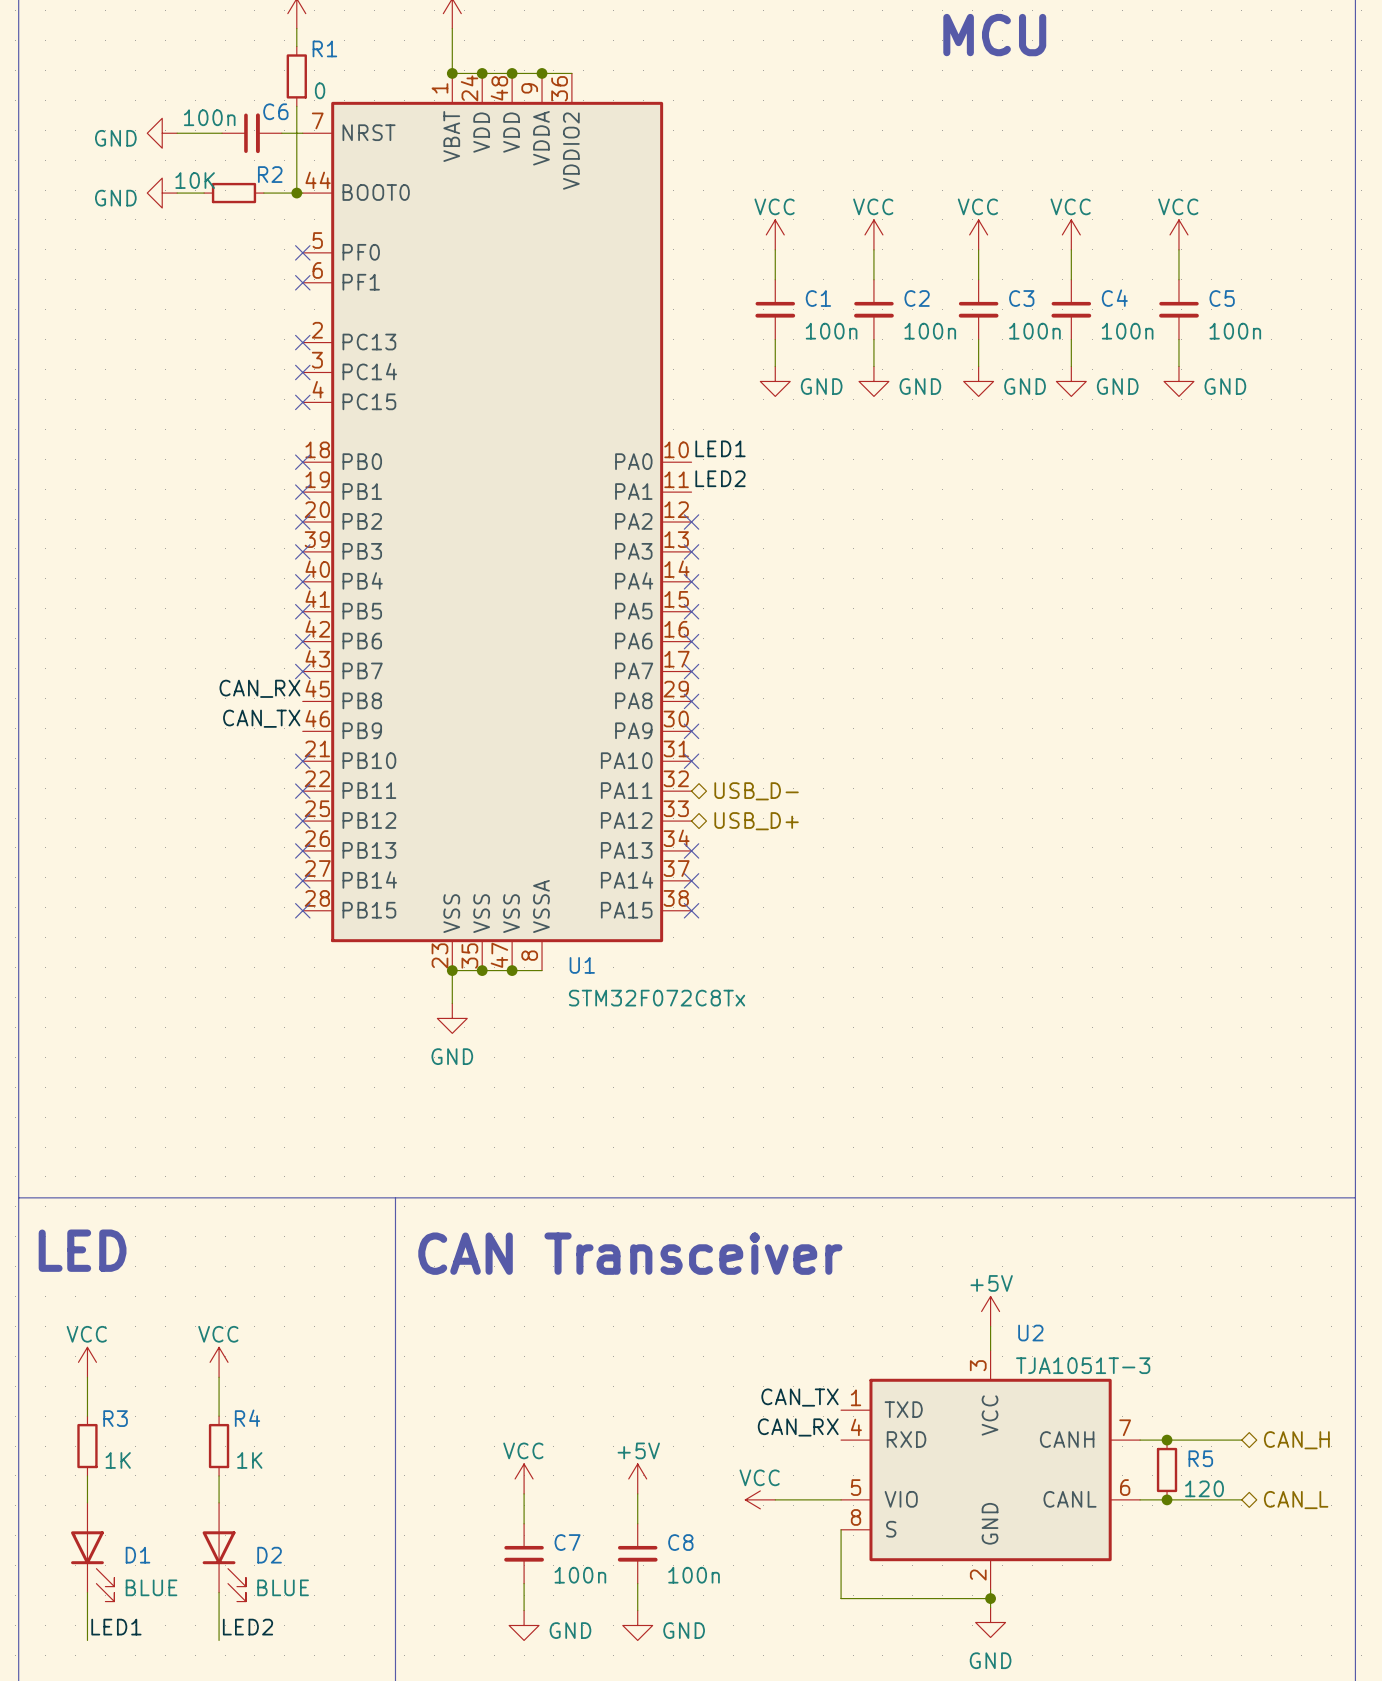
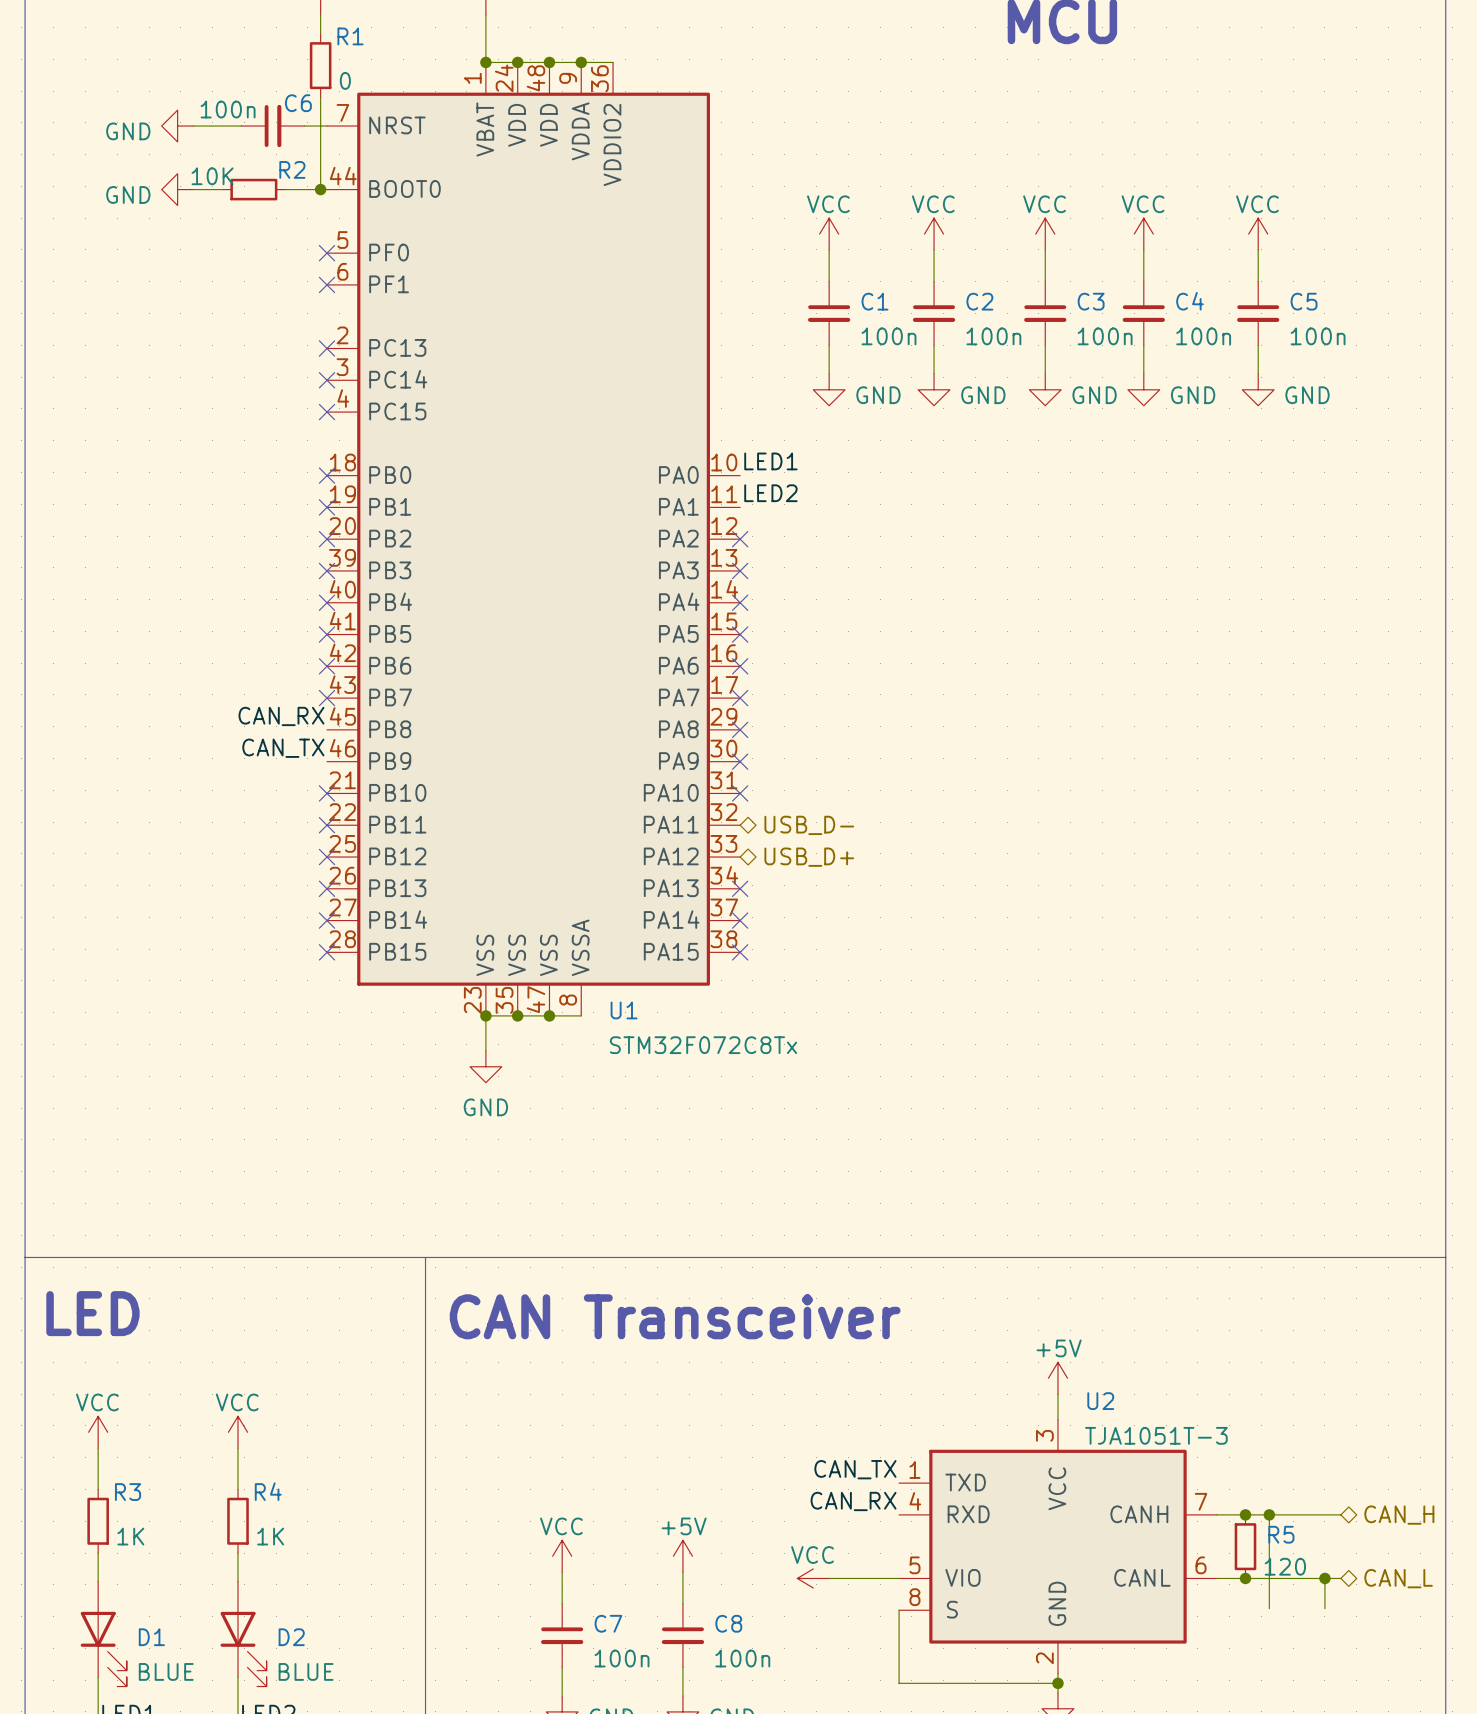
wire: none -> (1269, 1514) (1269, 1608)
junction: none -> (1269, 1514)
wire: none -> (1324, 1514) (1340, 1514)
hierarchical label position: CAN_H (1296, 1440) -> CAN_H (1399, 1515)
junction: none -> (1324, 1578)
wire: none -> (1340, 1578) (1324, 1578) (1324, 1608)
hierarchical label position: CAN_L (1296, 1500) -> CAN_L (1398, 1578)

